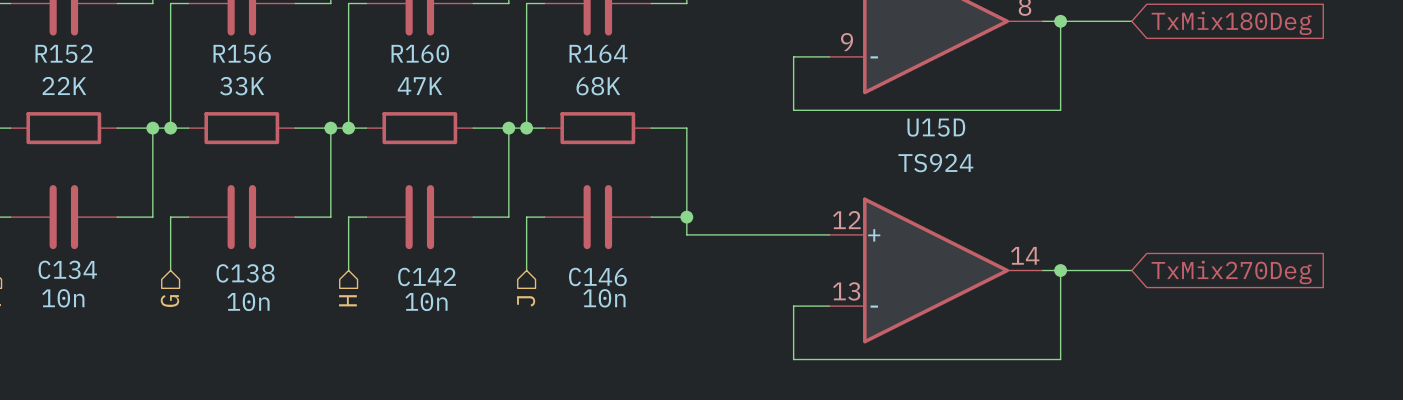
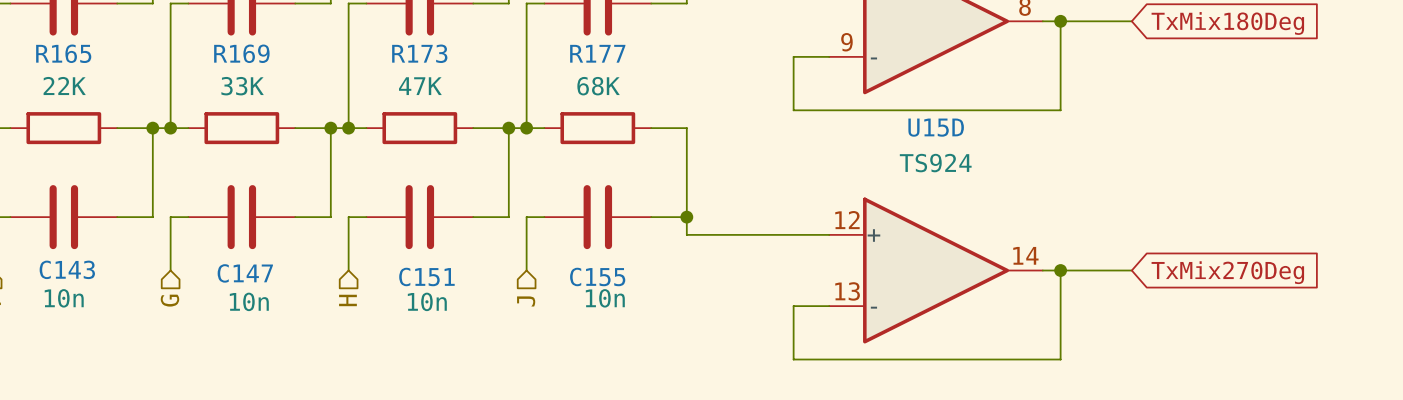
R152 name: R152 (64, 53) -> R165 (63, 53)
R156 name: R156 (242, 53) -> R169 (241, 53)
R160 name: R160 (420, 53) -> R173 (419, 53)
R164 name: R164 (598, 53) -> R177 (597, 53)
C134 name: C134 (67, 269) -> C143 (67, 269)
C138 name: C138 (245, 273) -> C147 (245, 273)
C142 name: C142 (427, 276) -> C151 (426, 276)
C146 name: C146 (597, 276) -> C155 (597, 276)

